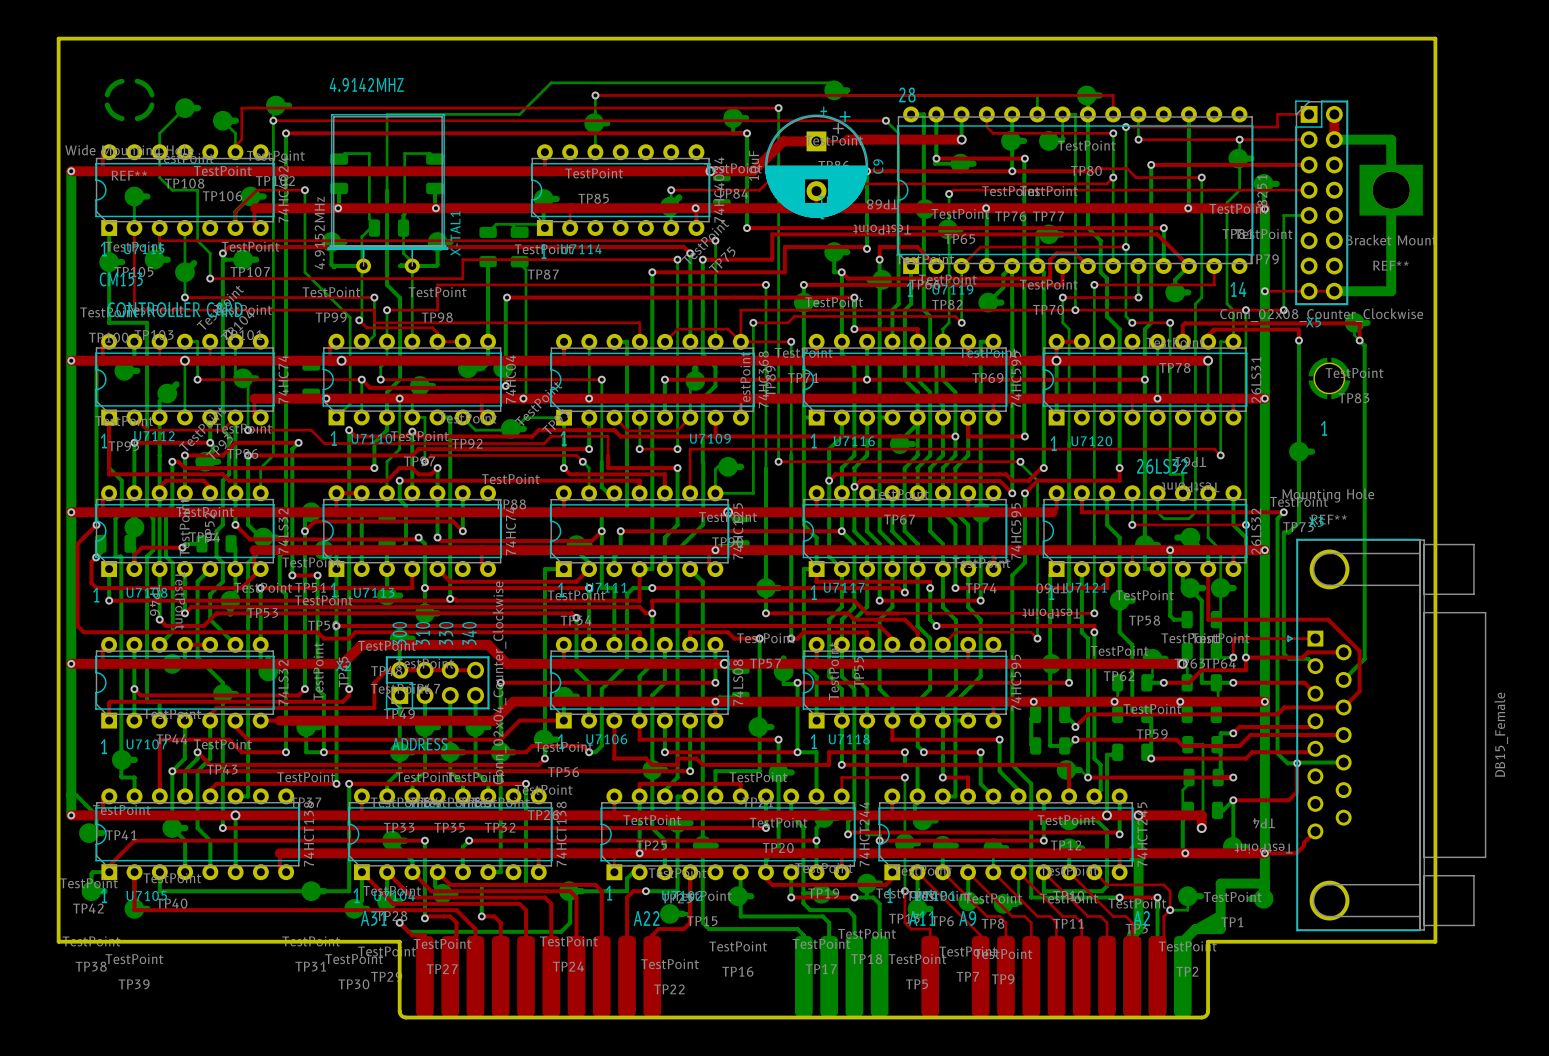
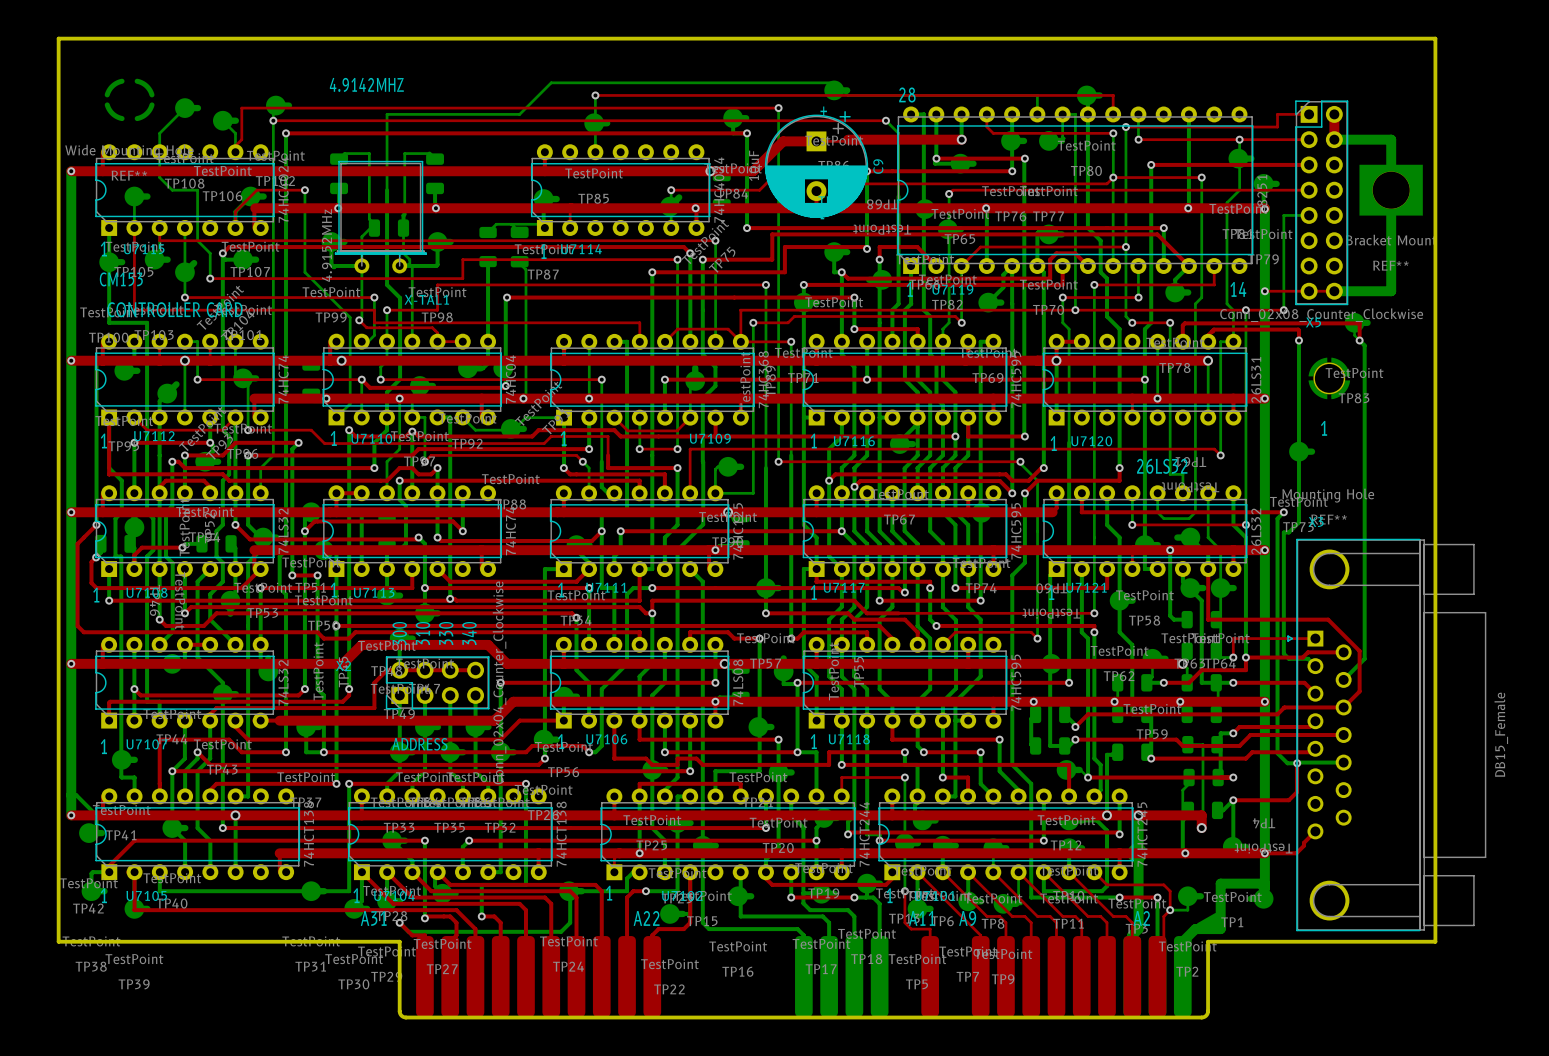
X-TAL1 footprint: [327, 114, 449, 274] -> [334, 160, 427, 274]
top track: (1012, 171) (1094, 171) (1096, 168) (1127, 168) (1136, 177) -> (1113, 177) (1136, 177)
X-TAL1 name position: X-TAL1 (455, 233) -> X-TAL1 (426, 299)

